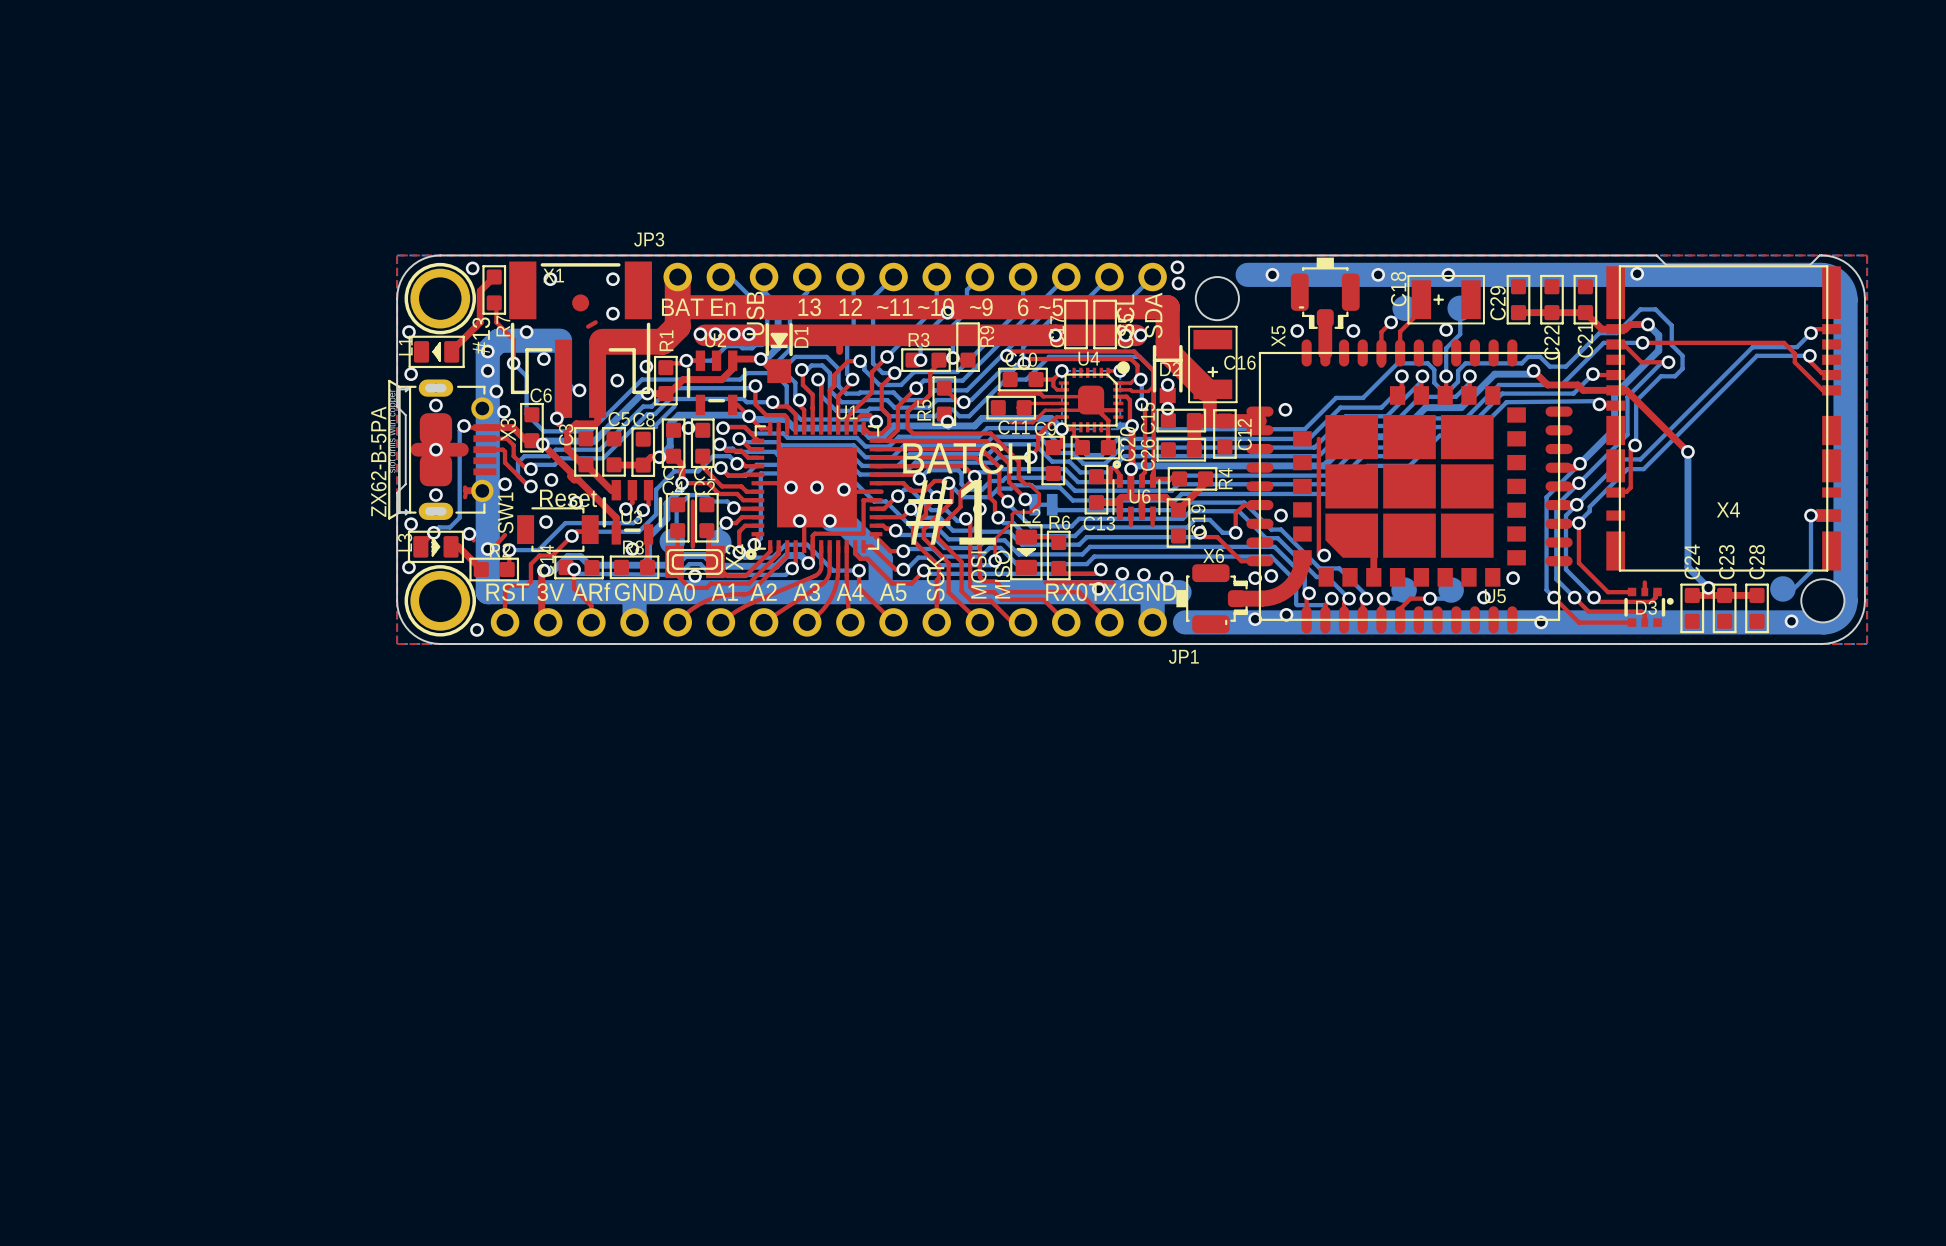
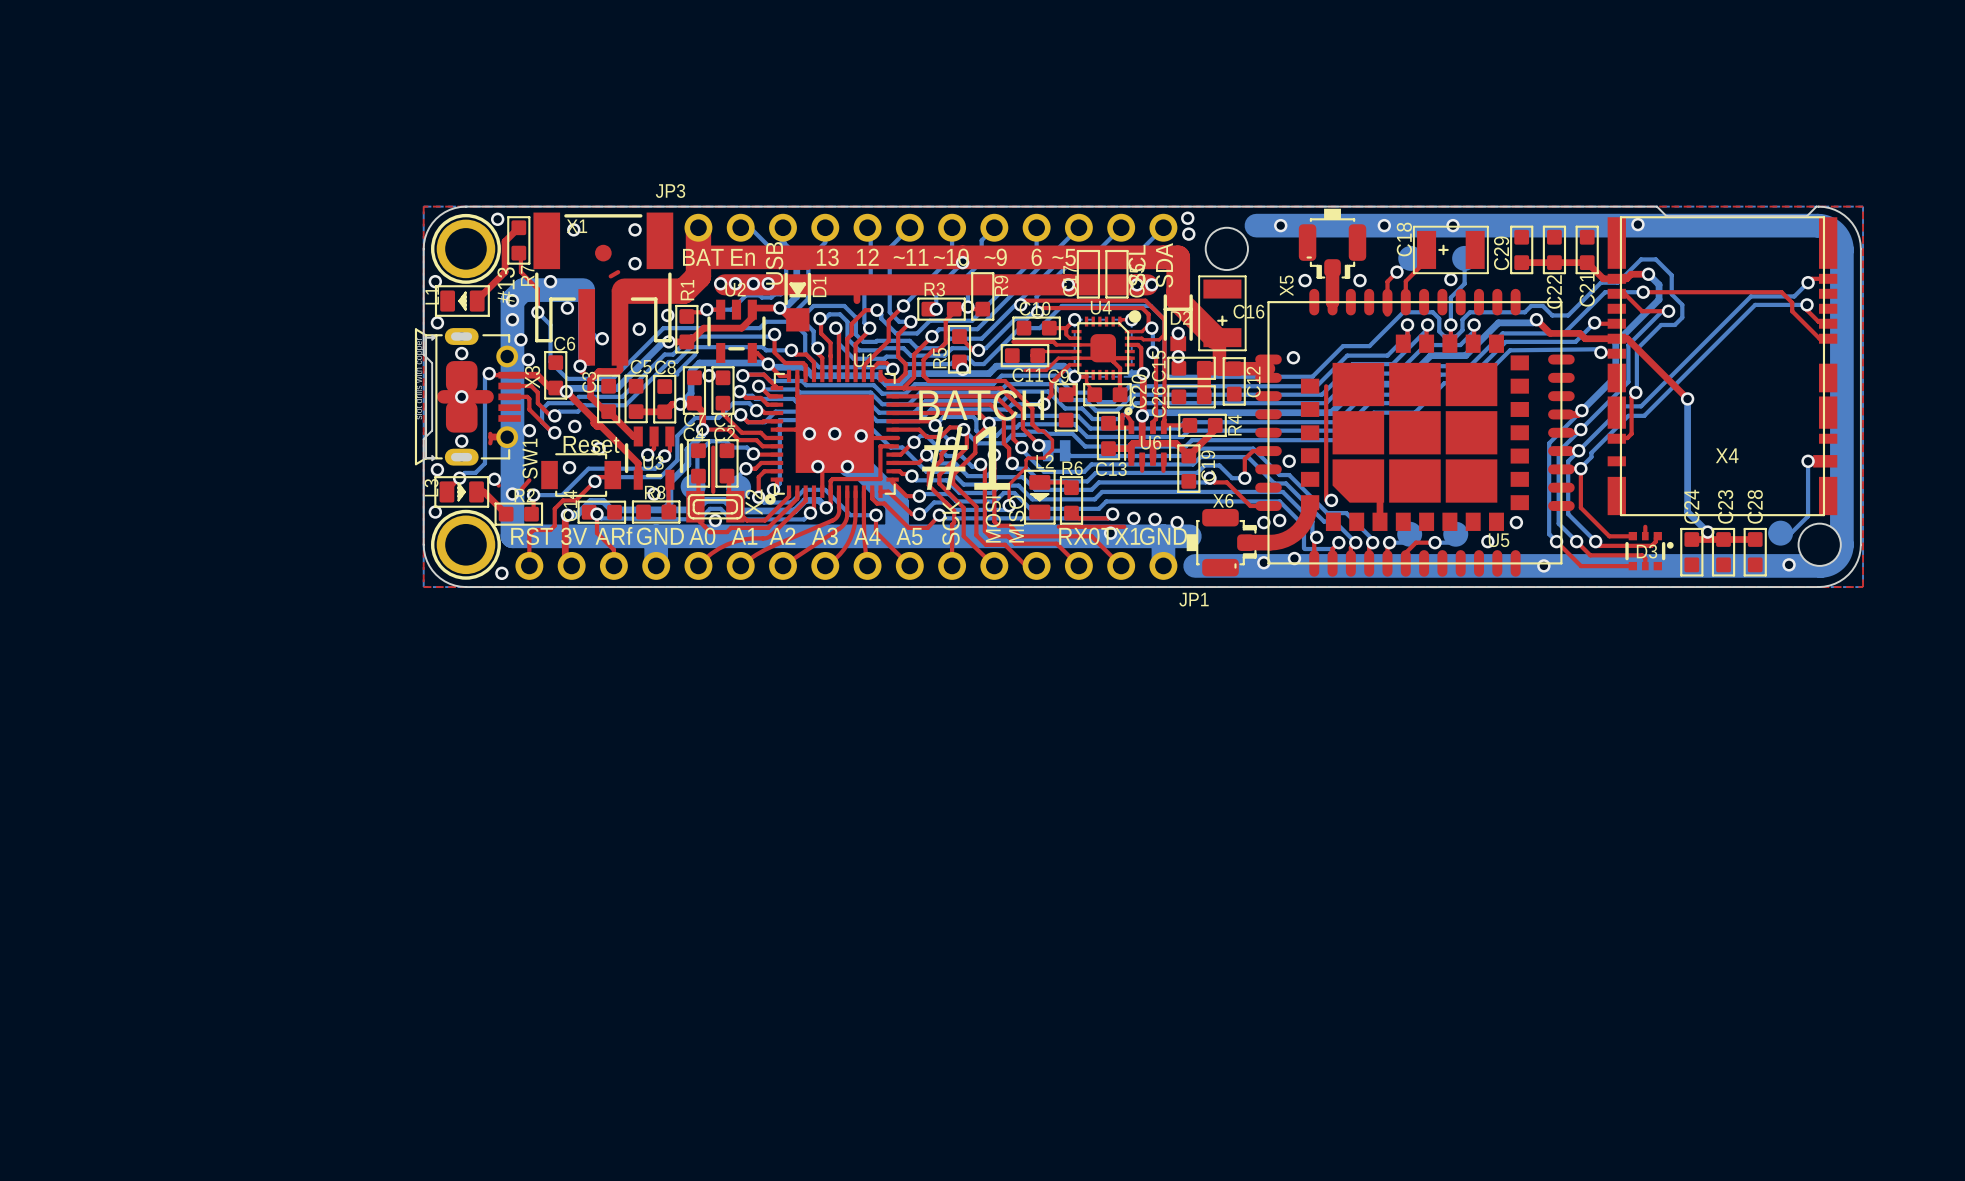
X3 value: ZX62-B-5PA (378, 461) -> none

